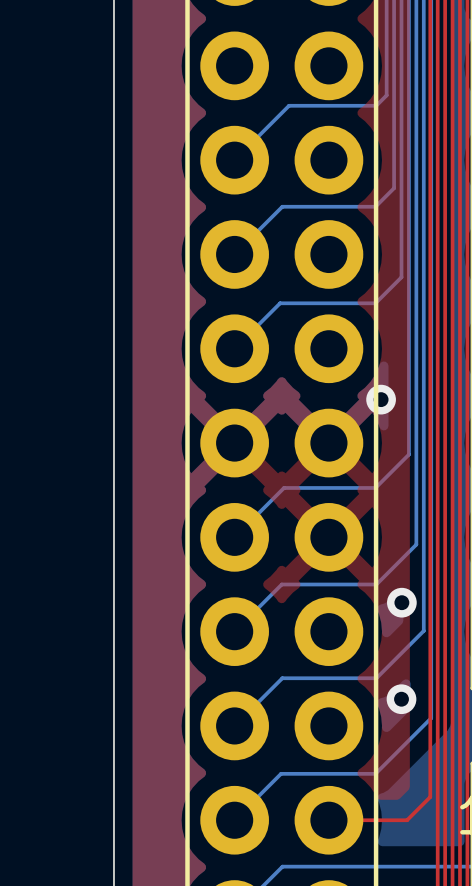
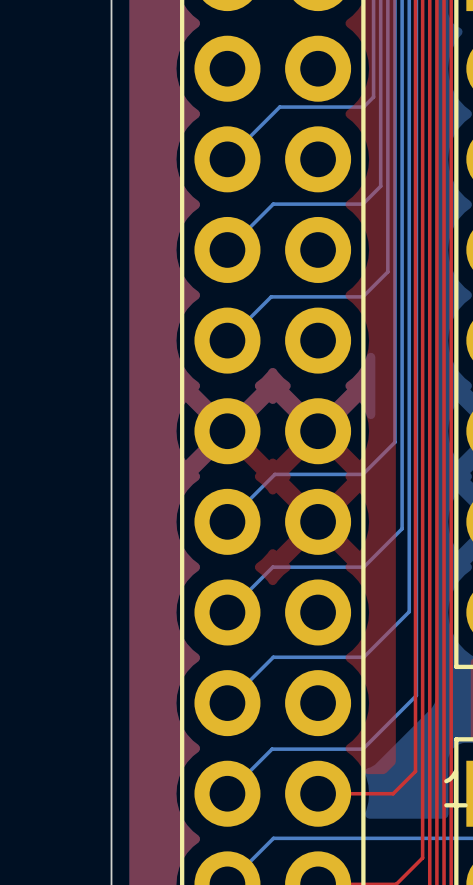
via: (381, 399) -> none
via: (401, 602) -> none
via: (401, 699) -> none

